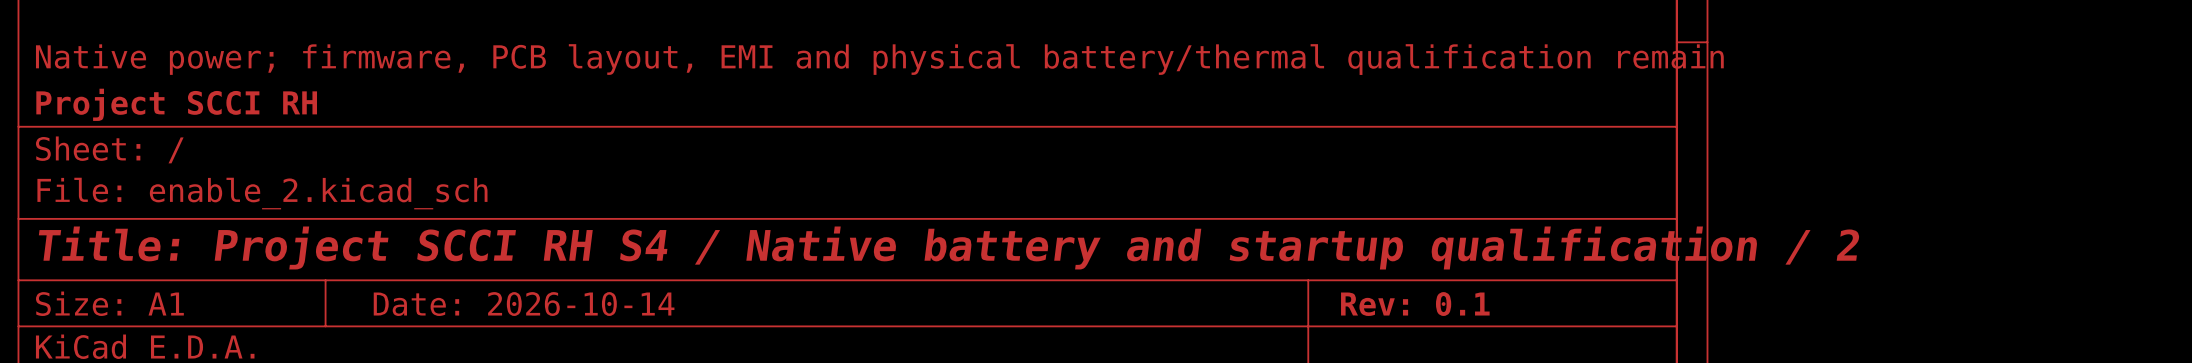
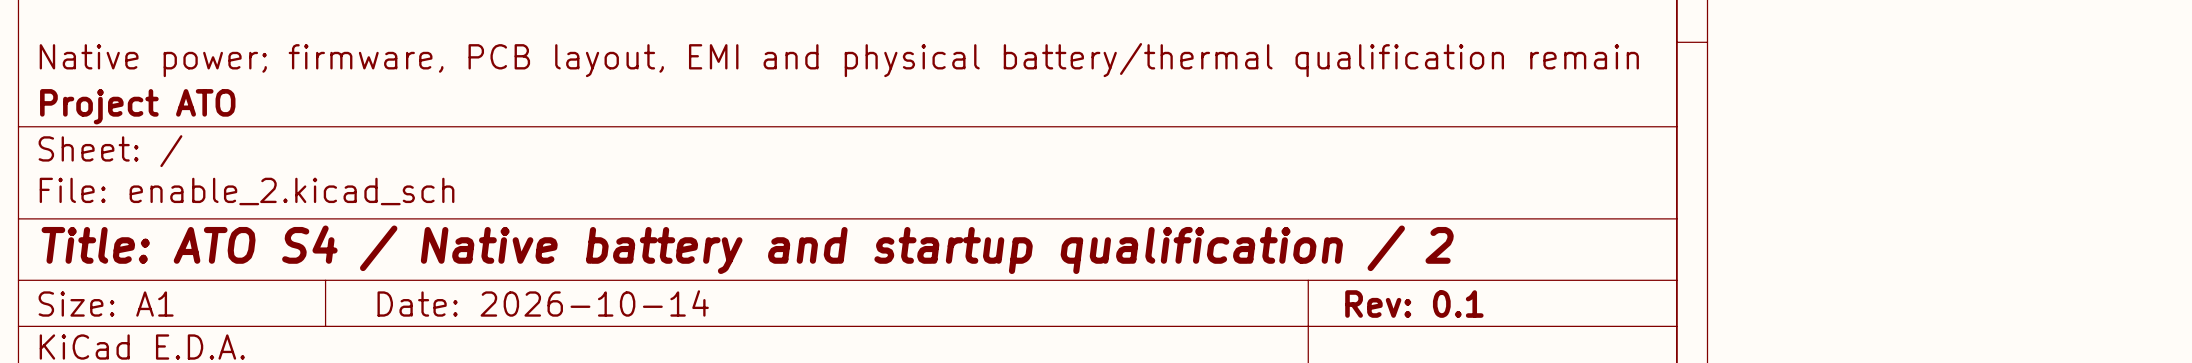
title block: Project SCCI RH (176, 104) -> Project ATO (137, 106)
title block: Title: Project SCCI RH S4 / Native battery and startup qualification / 2 (949, 247) -> Title: ATO S4 / Native battery and startup qualification / 2 (747, 249)

